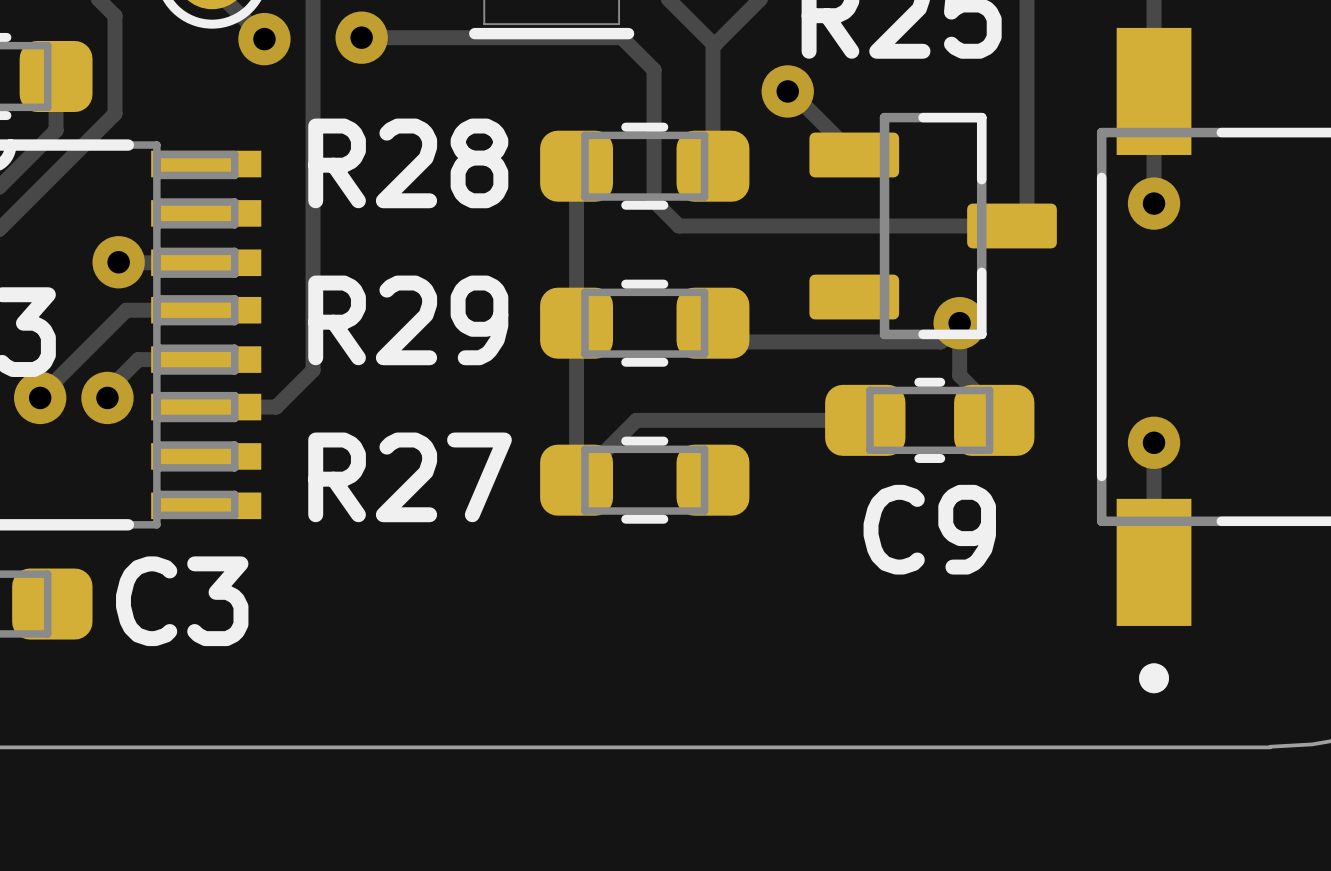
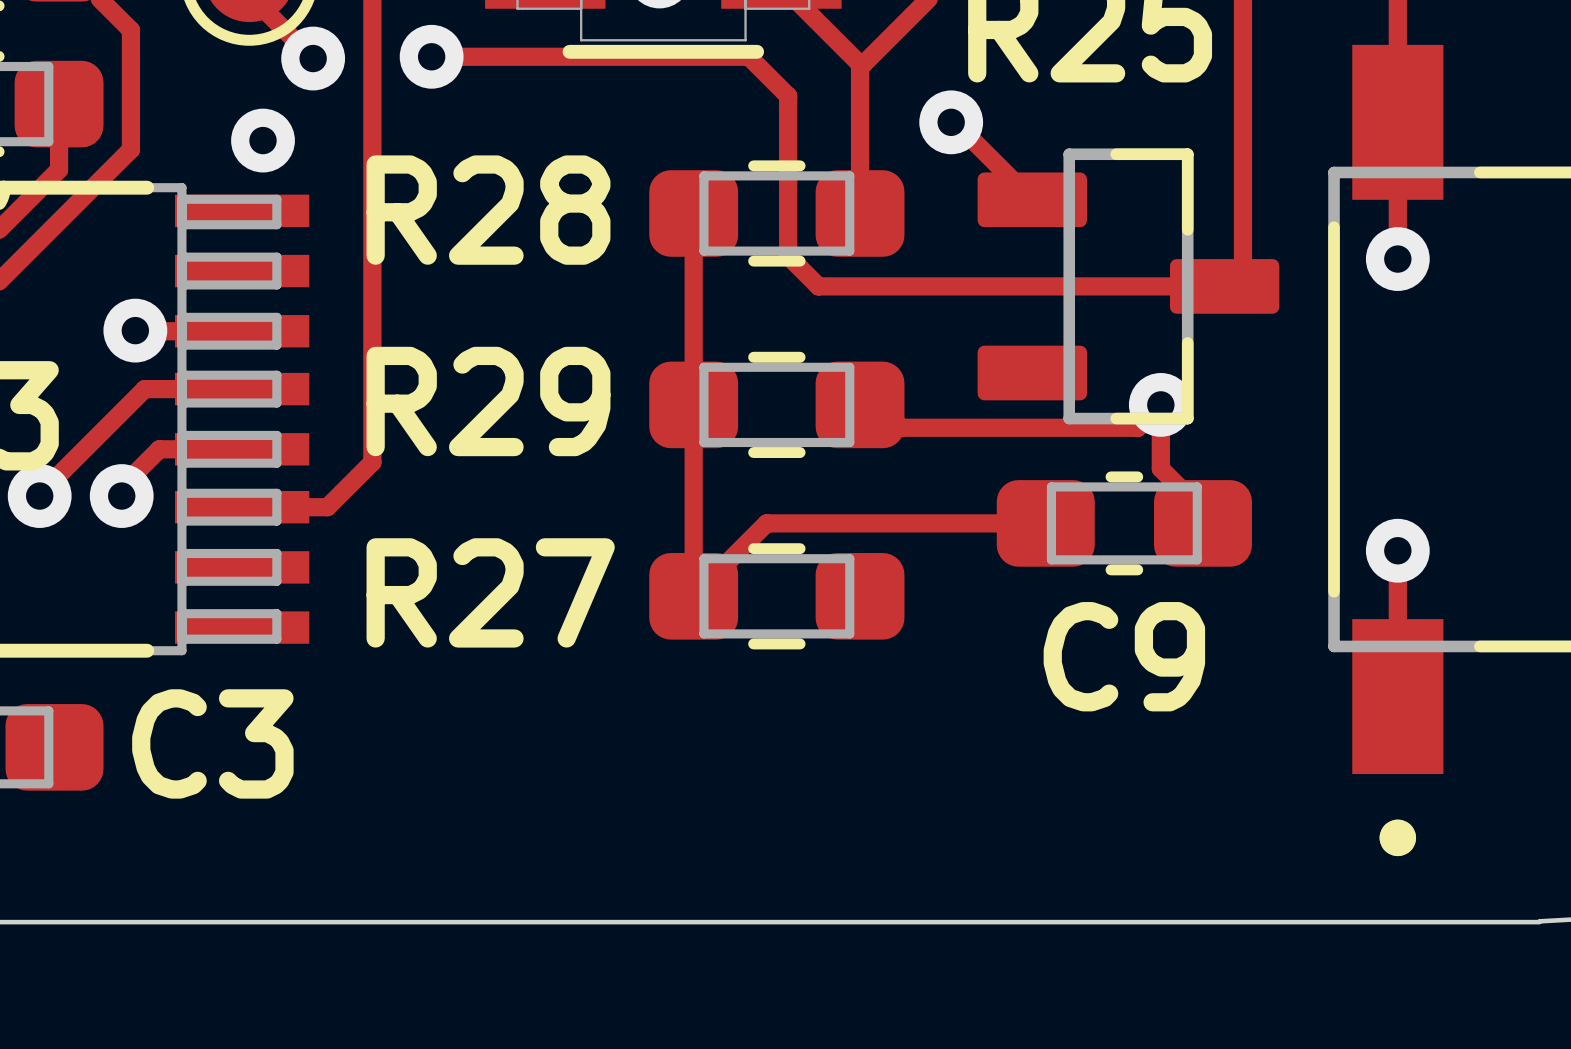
via: none -> (263, 140)

